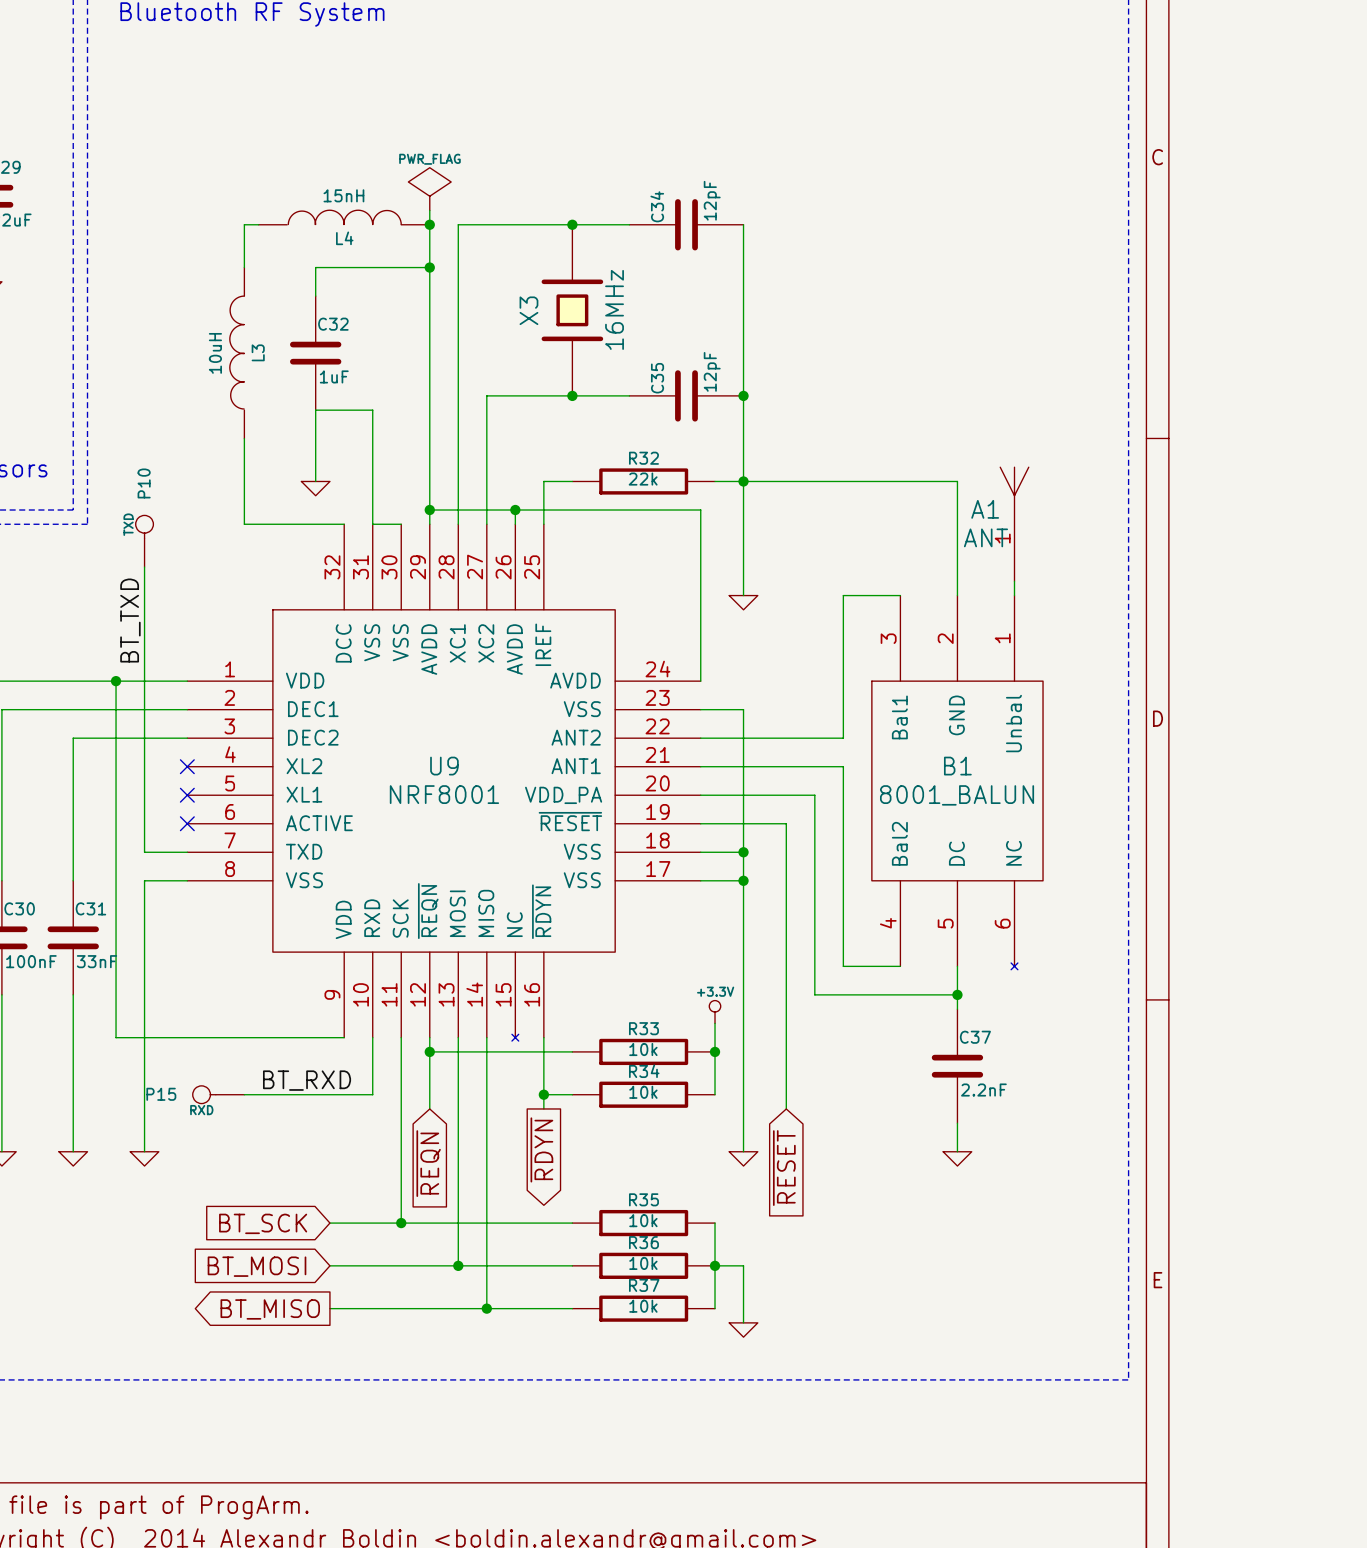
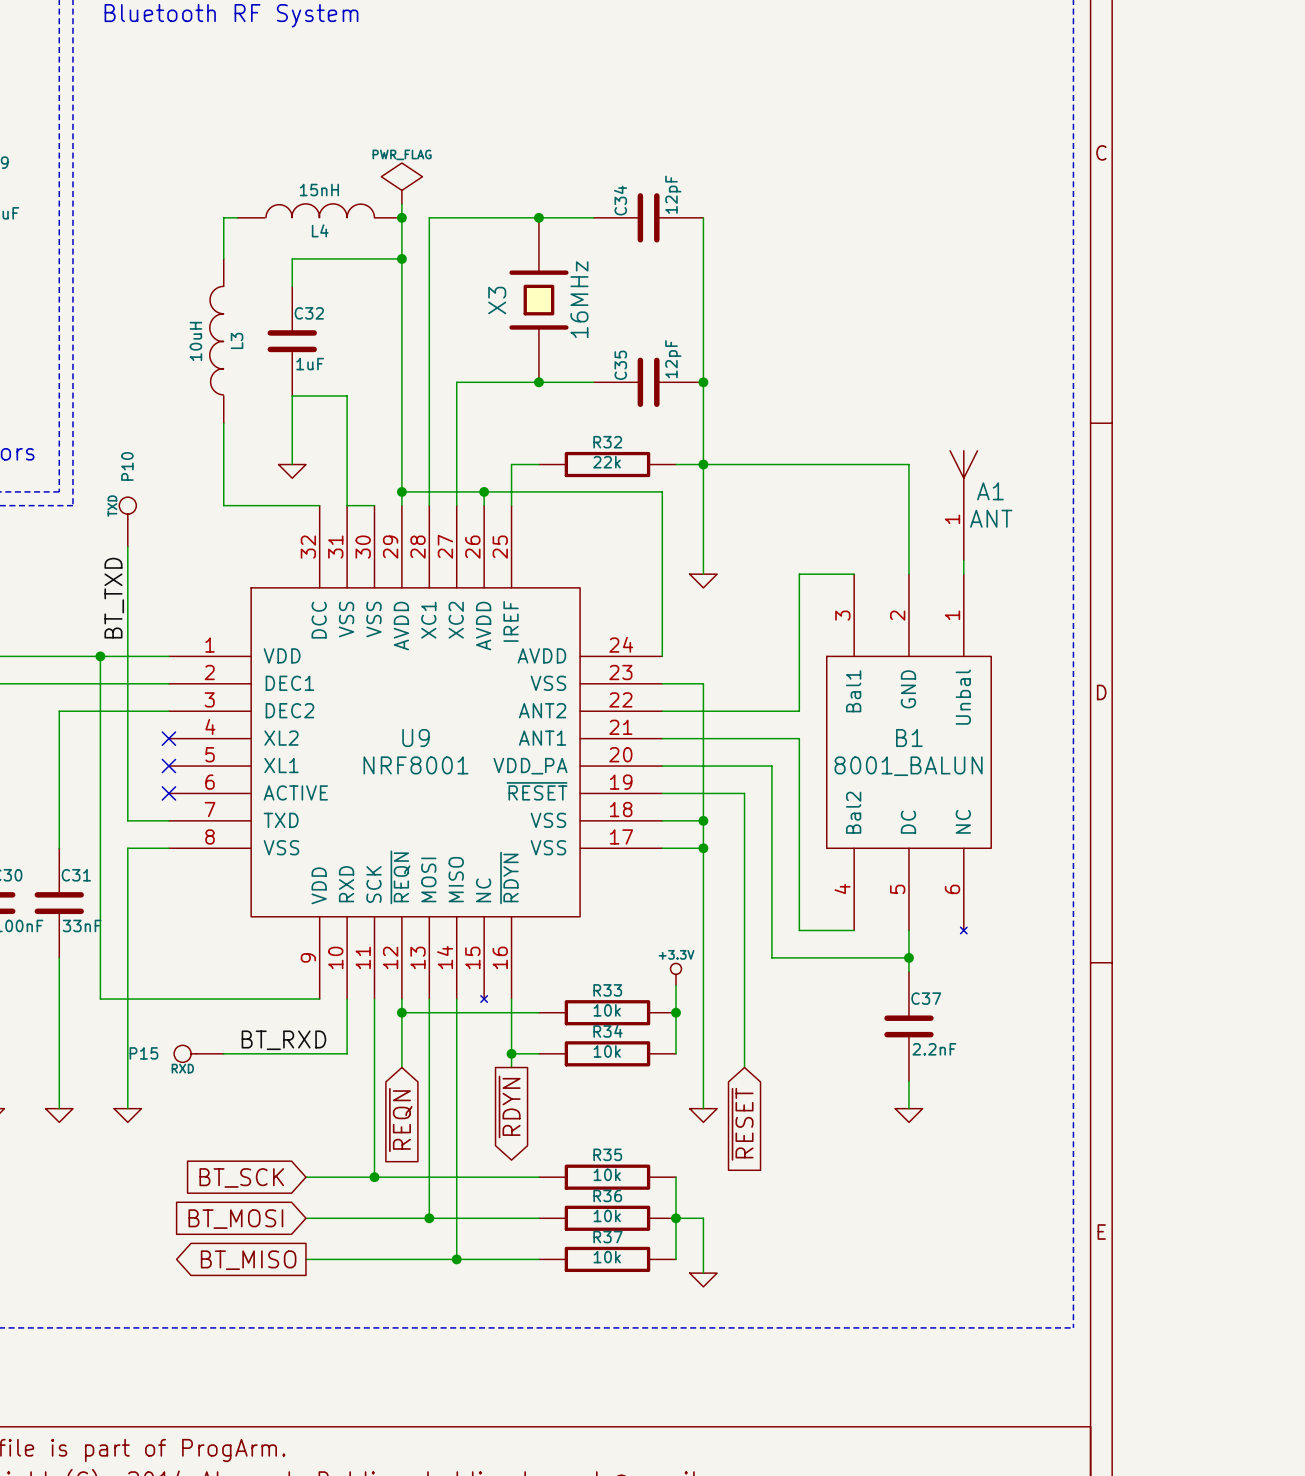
A1 name position: A1 (985, 509) -> A1 (990, 491)
A1 value position: ANT (985, 537) -> ANT (991, 518)

